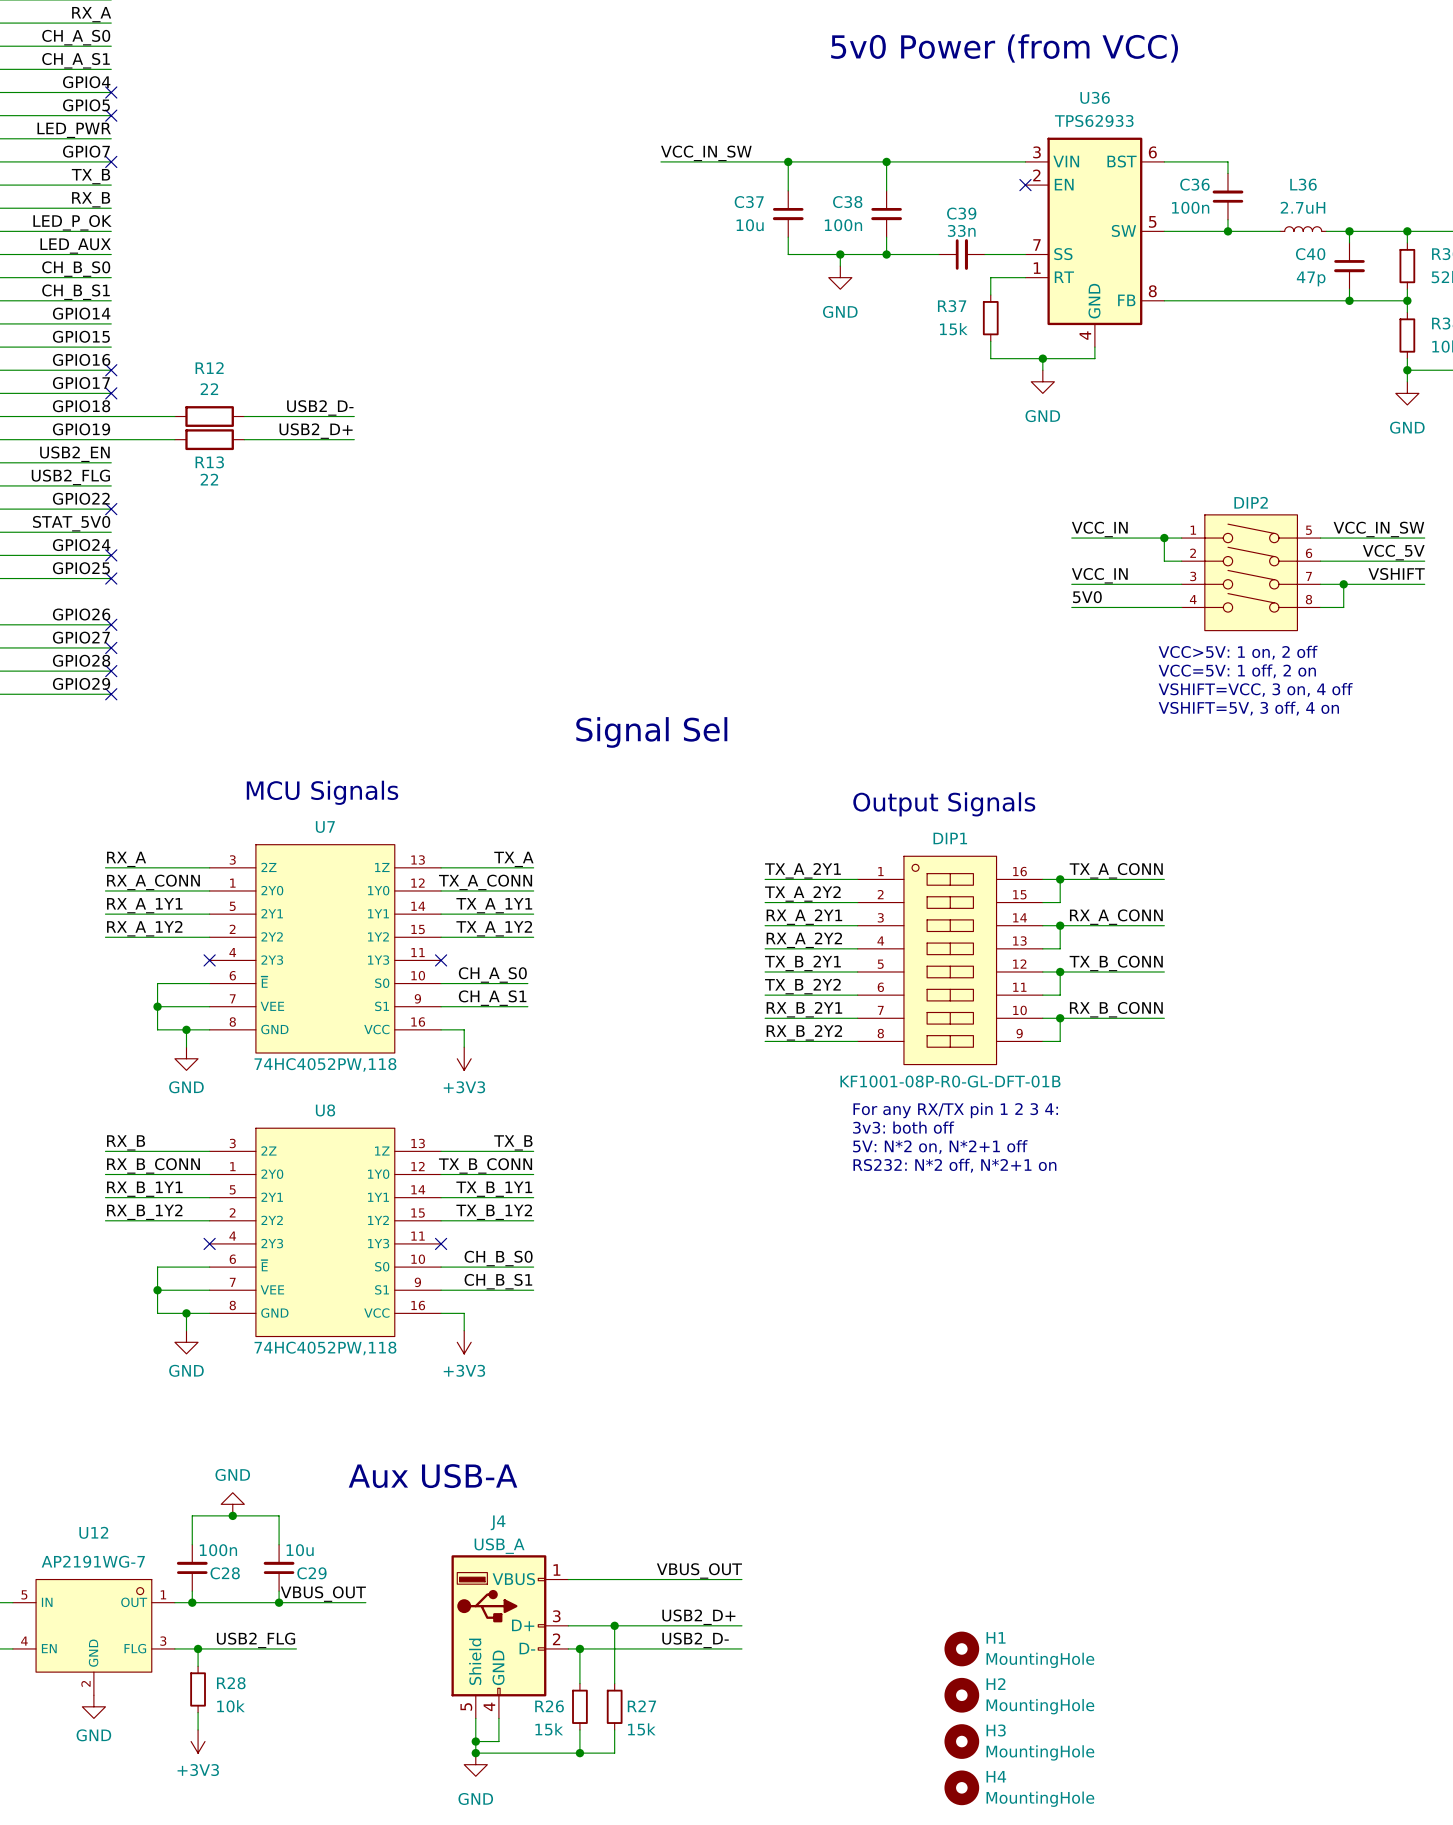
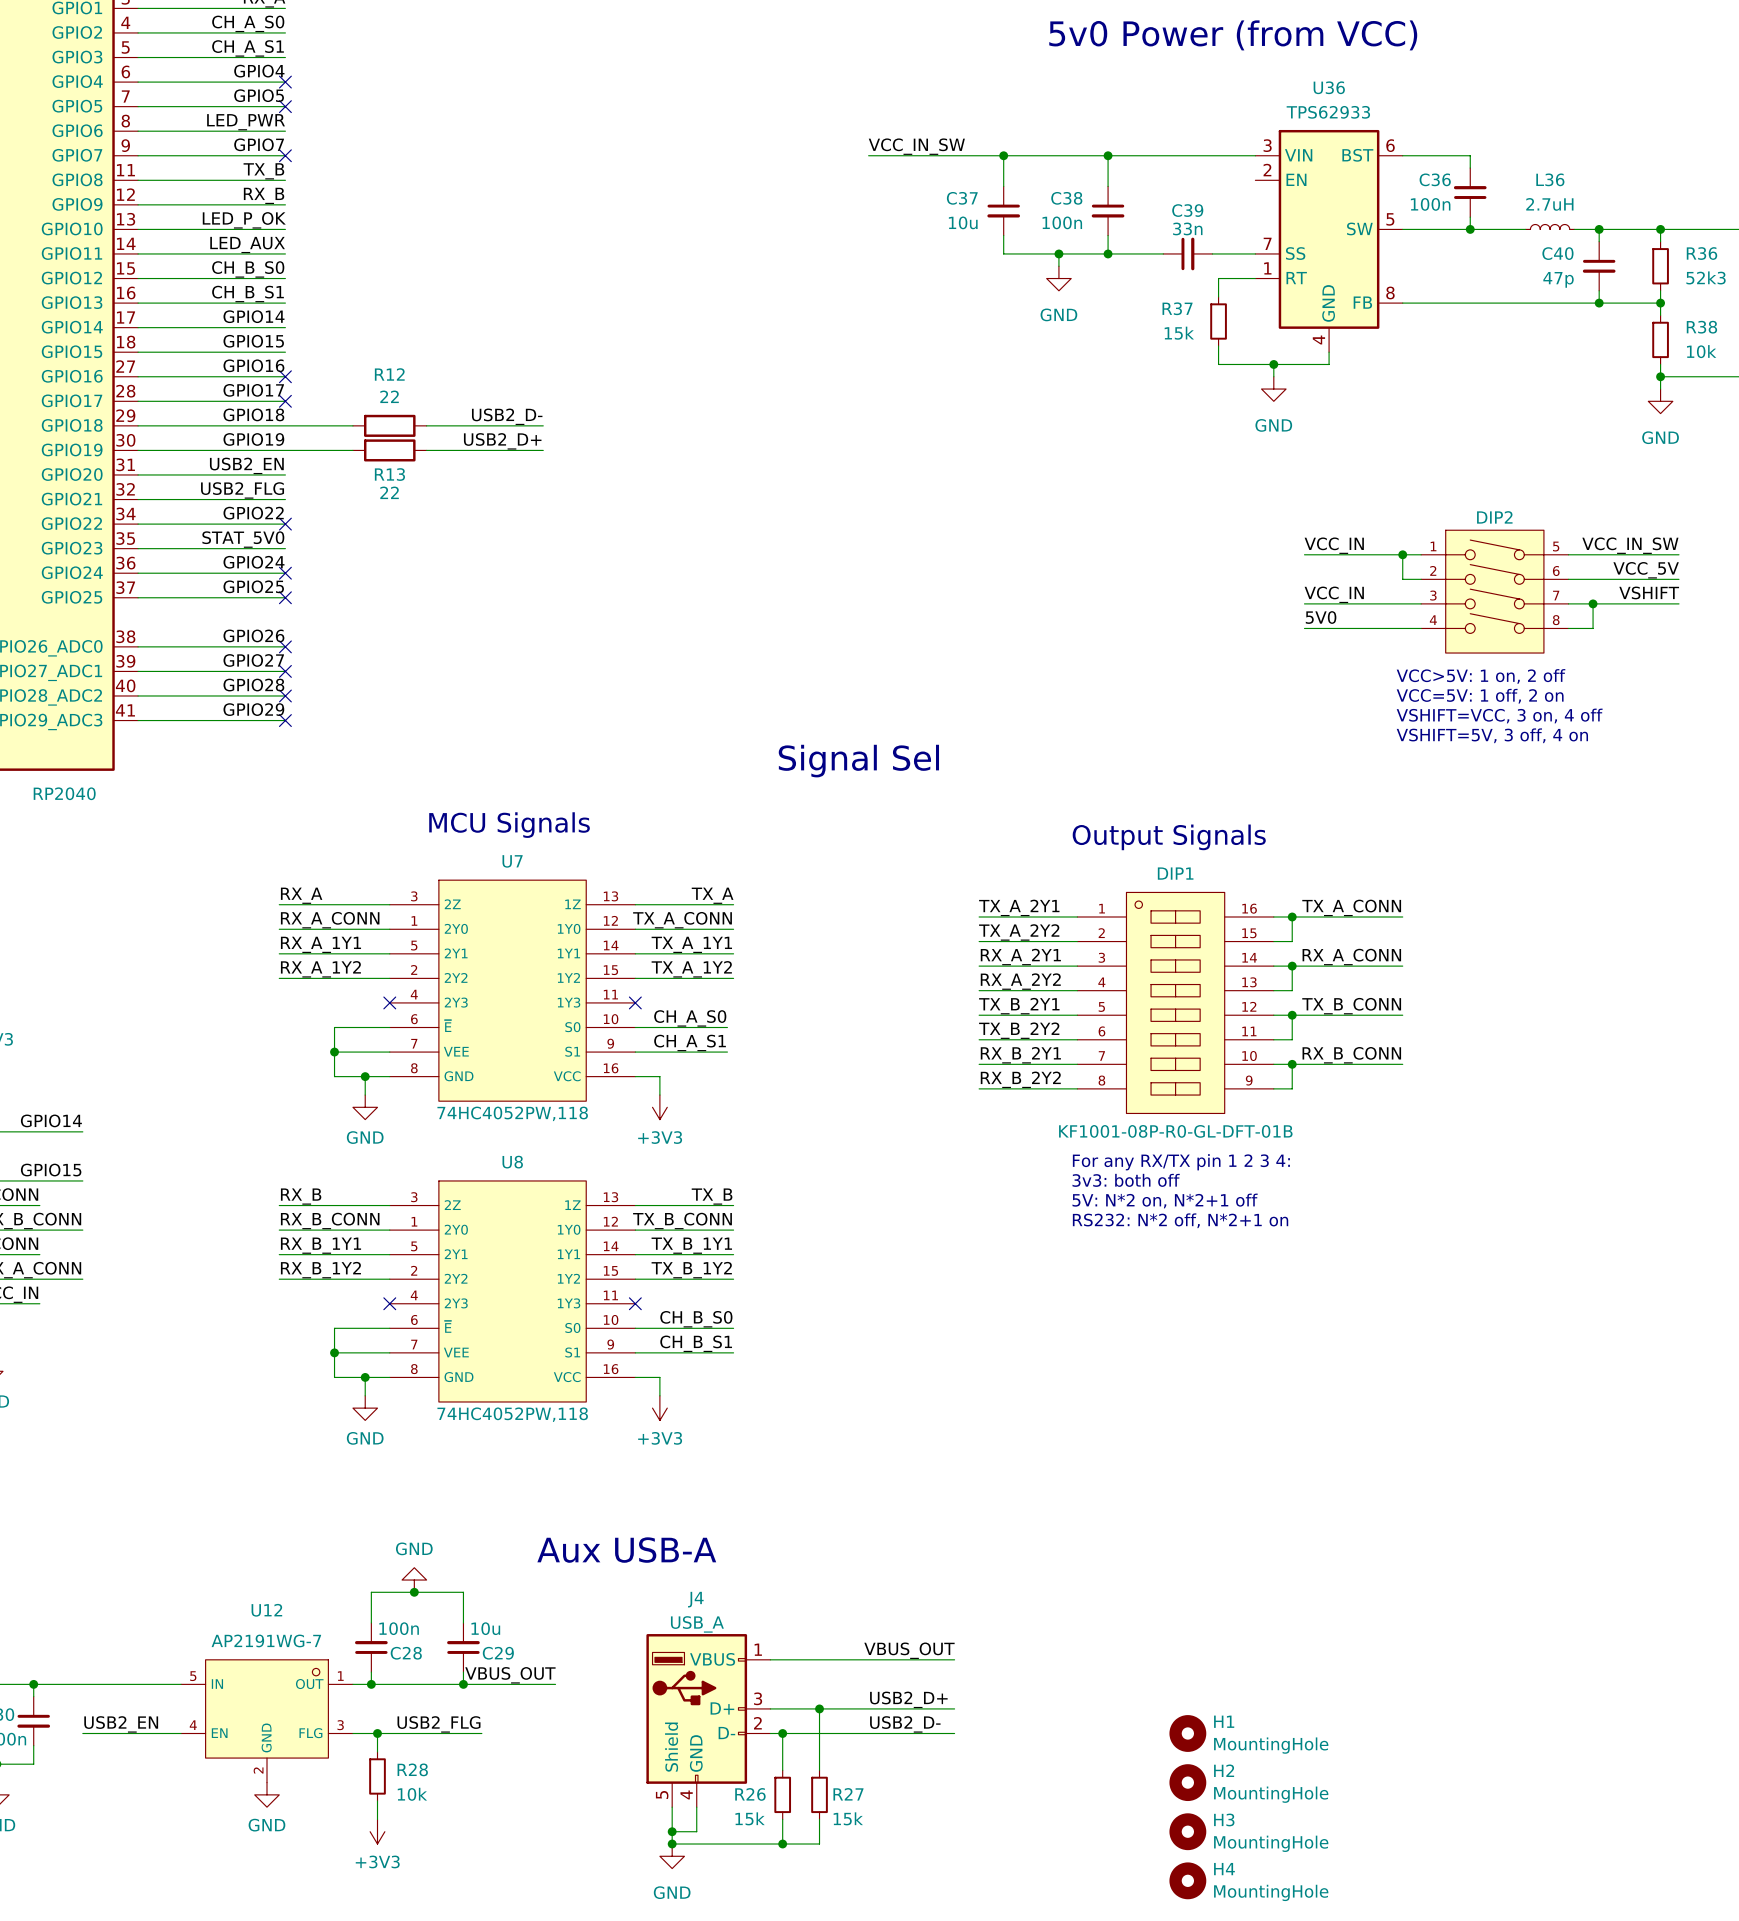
no-connect mark: (1025, 185) -> none

